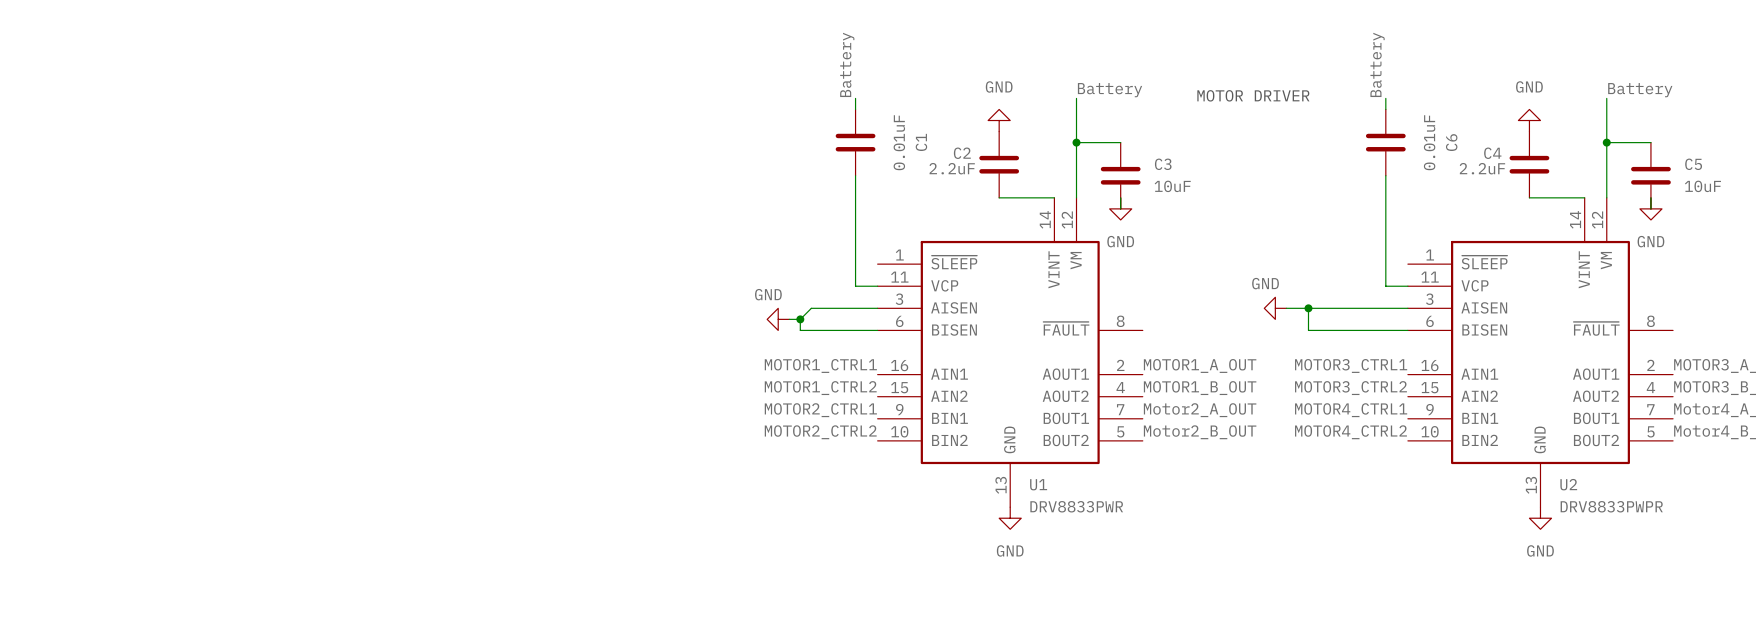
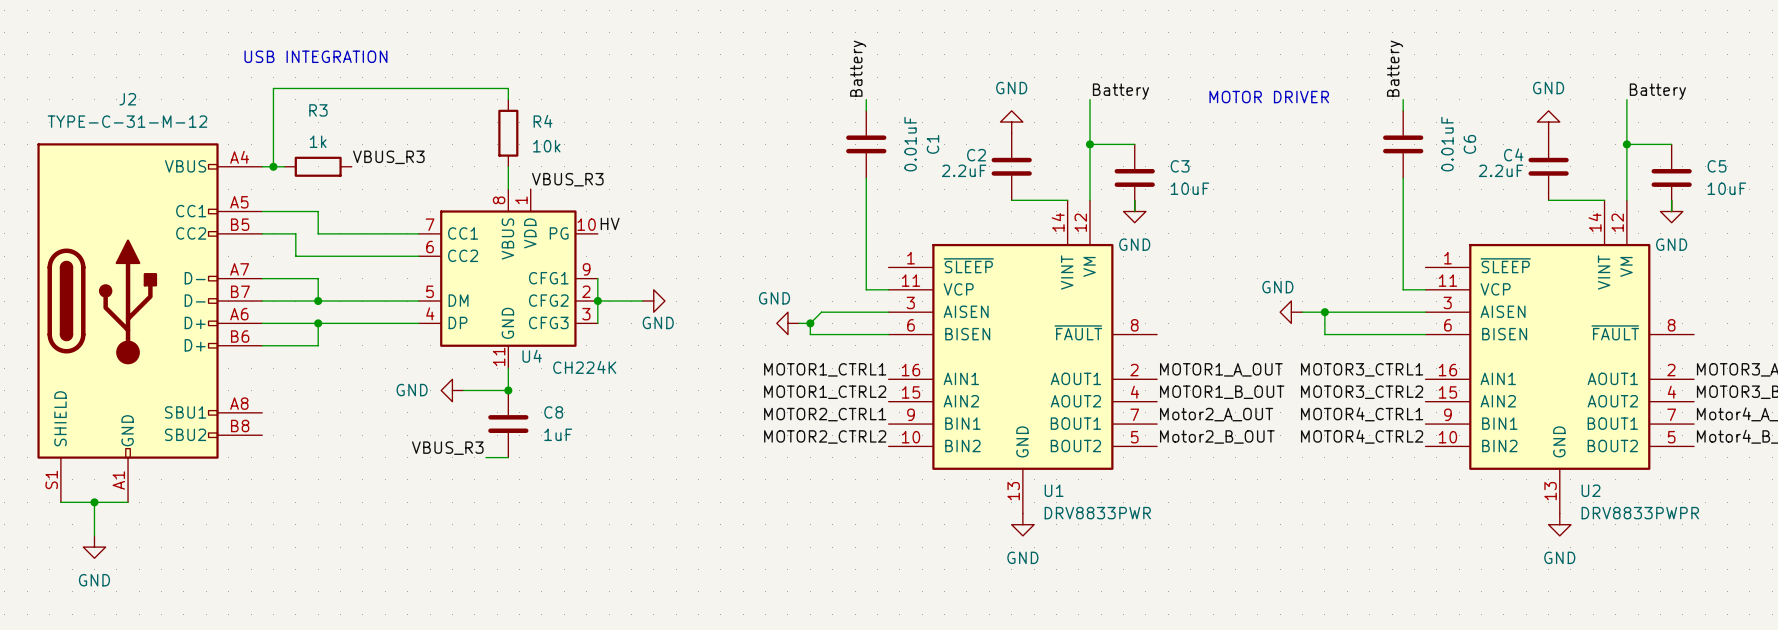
text: none -> USB INTEGRATION (315, 56)
wire: none -> (508, 99) (508, 88) (273, 88) (273, 166)
R4: none -> 10k (508, 133)
label: none -> VBUS_R3 (388, 157)
wire: none -> (262, 166) (284, 166)
junction: none -> (273, 166)
R3: none -> 1k (318, 166)
wire: none -> (508, 166) (508, 189)
label: none -> VBUS_R3 (567, 179)
wire: none -> (262, 211) (318, 211) (318, 233) (418, 233)
label: none -> HV (610, 223)
wire: none -> (262, 233) (295, 233) (295, 256) (418, 256)
wire: none -> (262, 278) (318, 278) (318, 301)
U4: none -> CH224K (508, 278)
wire: none -> (597, 278) (597, 323)
wire: none -> (262, 301) (418, 301)
junction: none -> (318, 301)
wire: none -> (597, 301) (642, 301)
junction: none -> (597, 301)
power symbol: none -> GND (653, 301)
J2: none -> TYPE-C-31-M-12 (149, 322)
wire: none -> (262, 323) (418, 323)
wire: none -> (318, 323) (318, 345) (262, 345)
junction: none -> (318, 323)
wire: none -> (508, 368) (508, 390) (463, 390)
power symbol: none -> GND (452, 390)
junction: none -> (508, 390)
C8: none -> 1uF (508, 424)
label: none -> VBUS_R3 (447, 448)
wire: none -> (485, 457) (508, 457)
wire: none -> (60, 502) (128, 502)
wire: none -> (94, 502) (94, 535)
junction: none -> (94, 502)
power symbol: none -> GND (94, 547)

